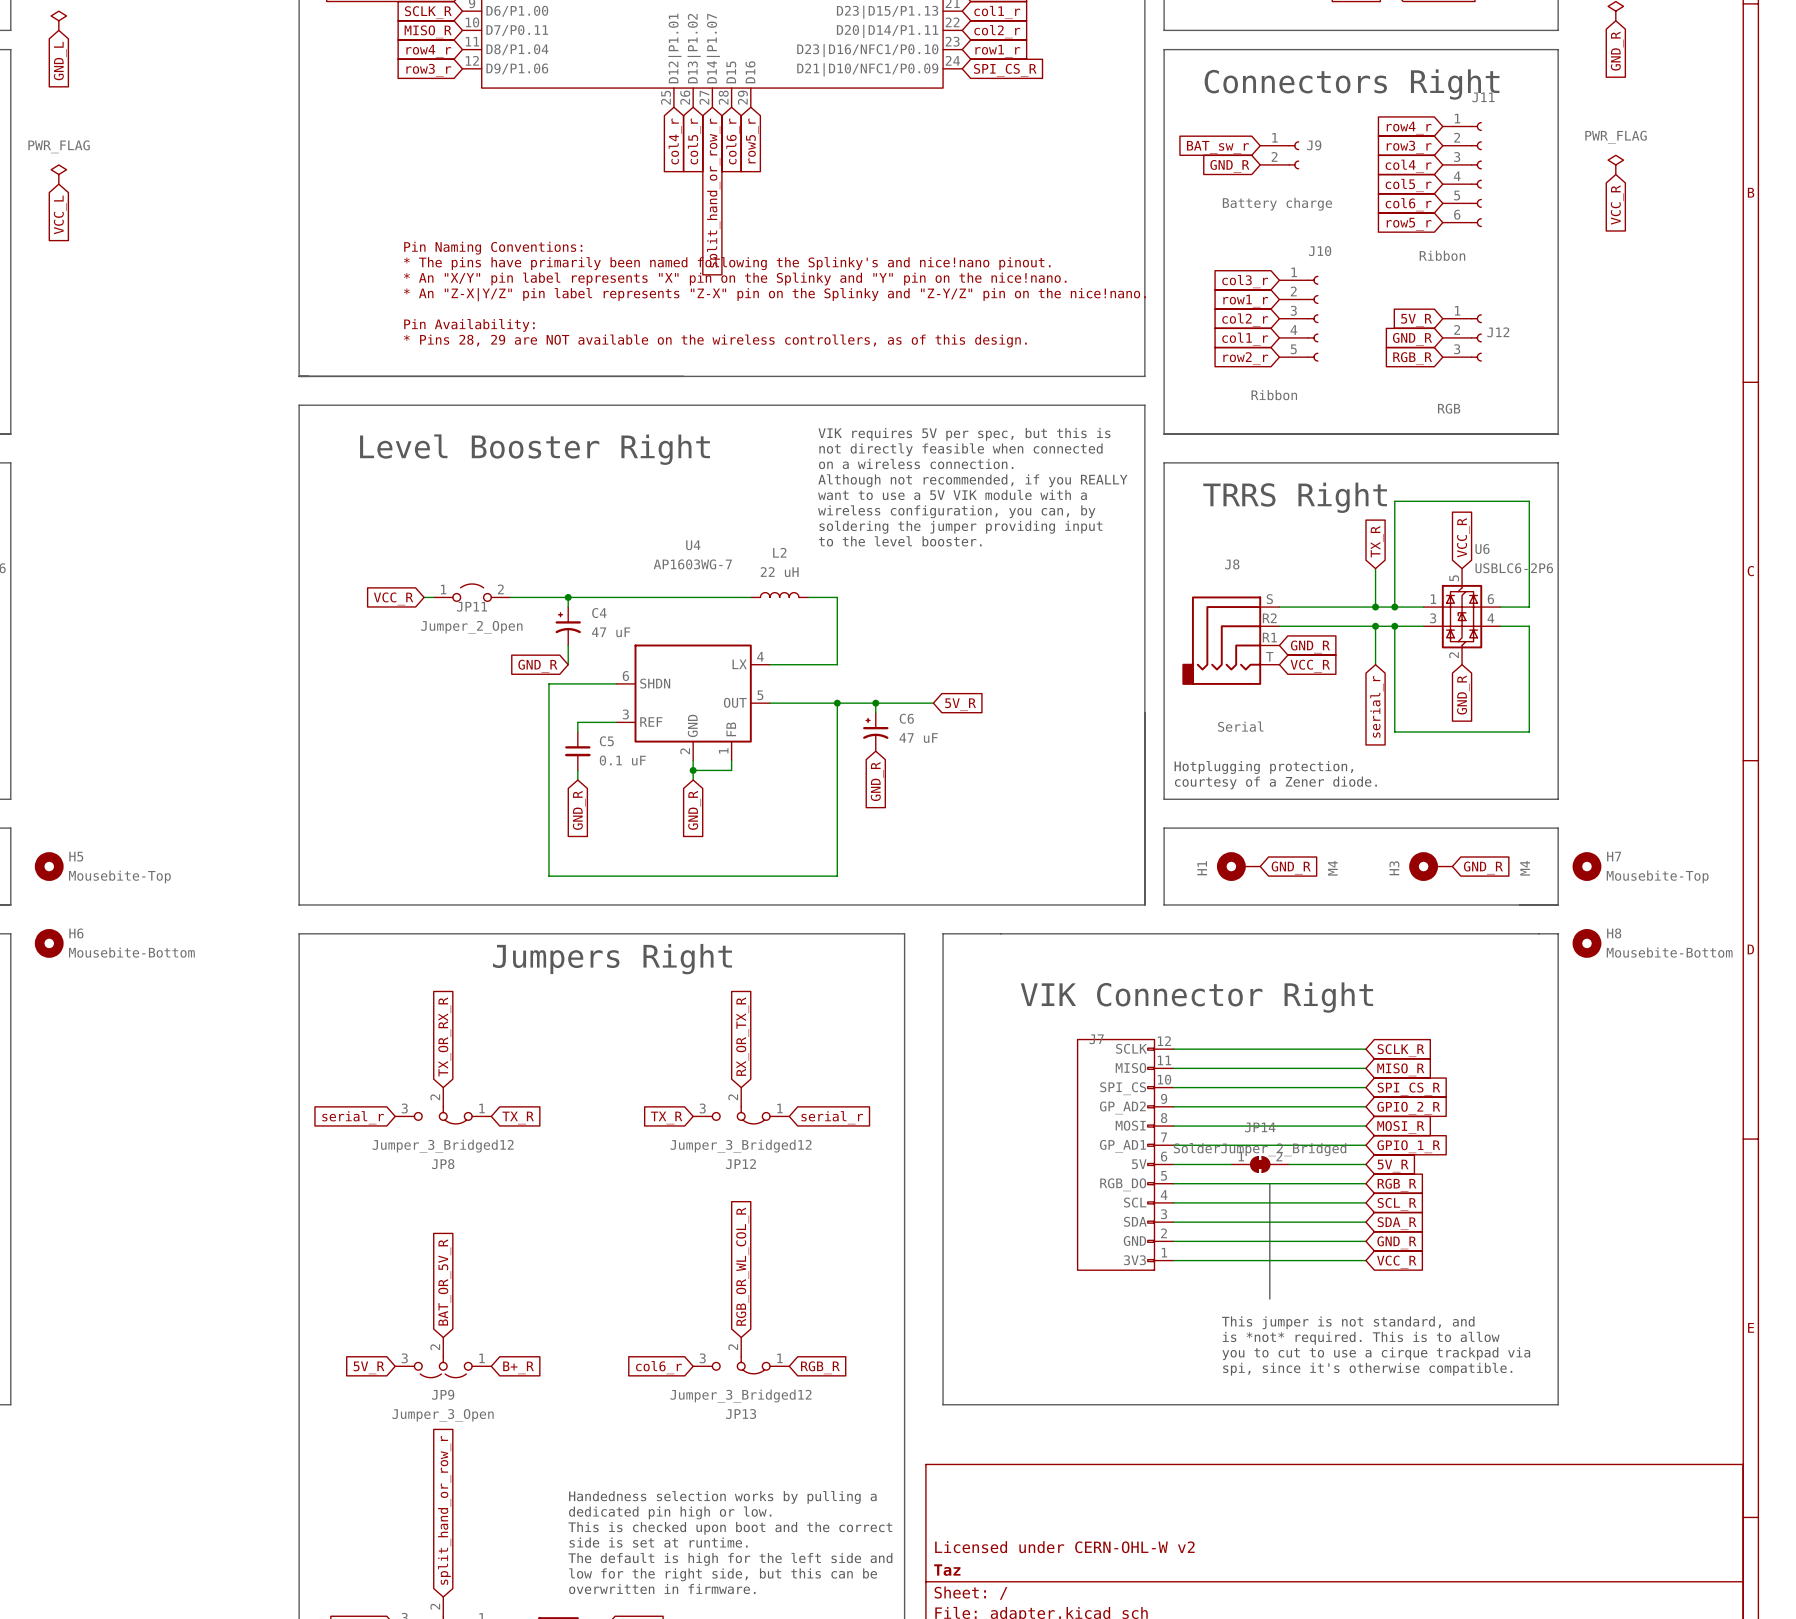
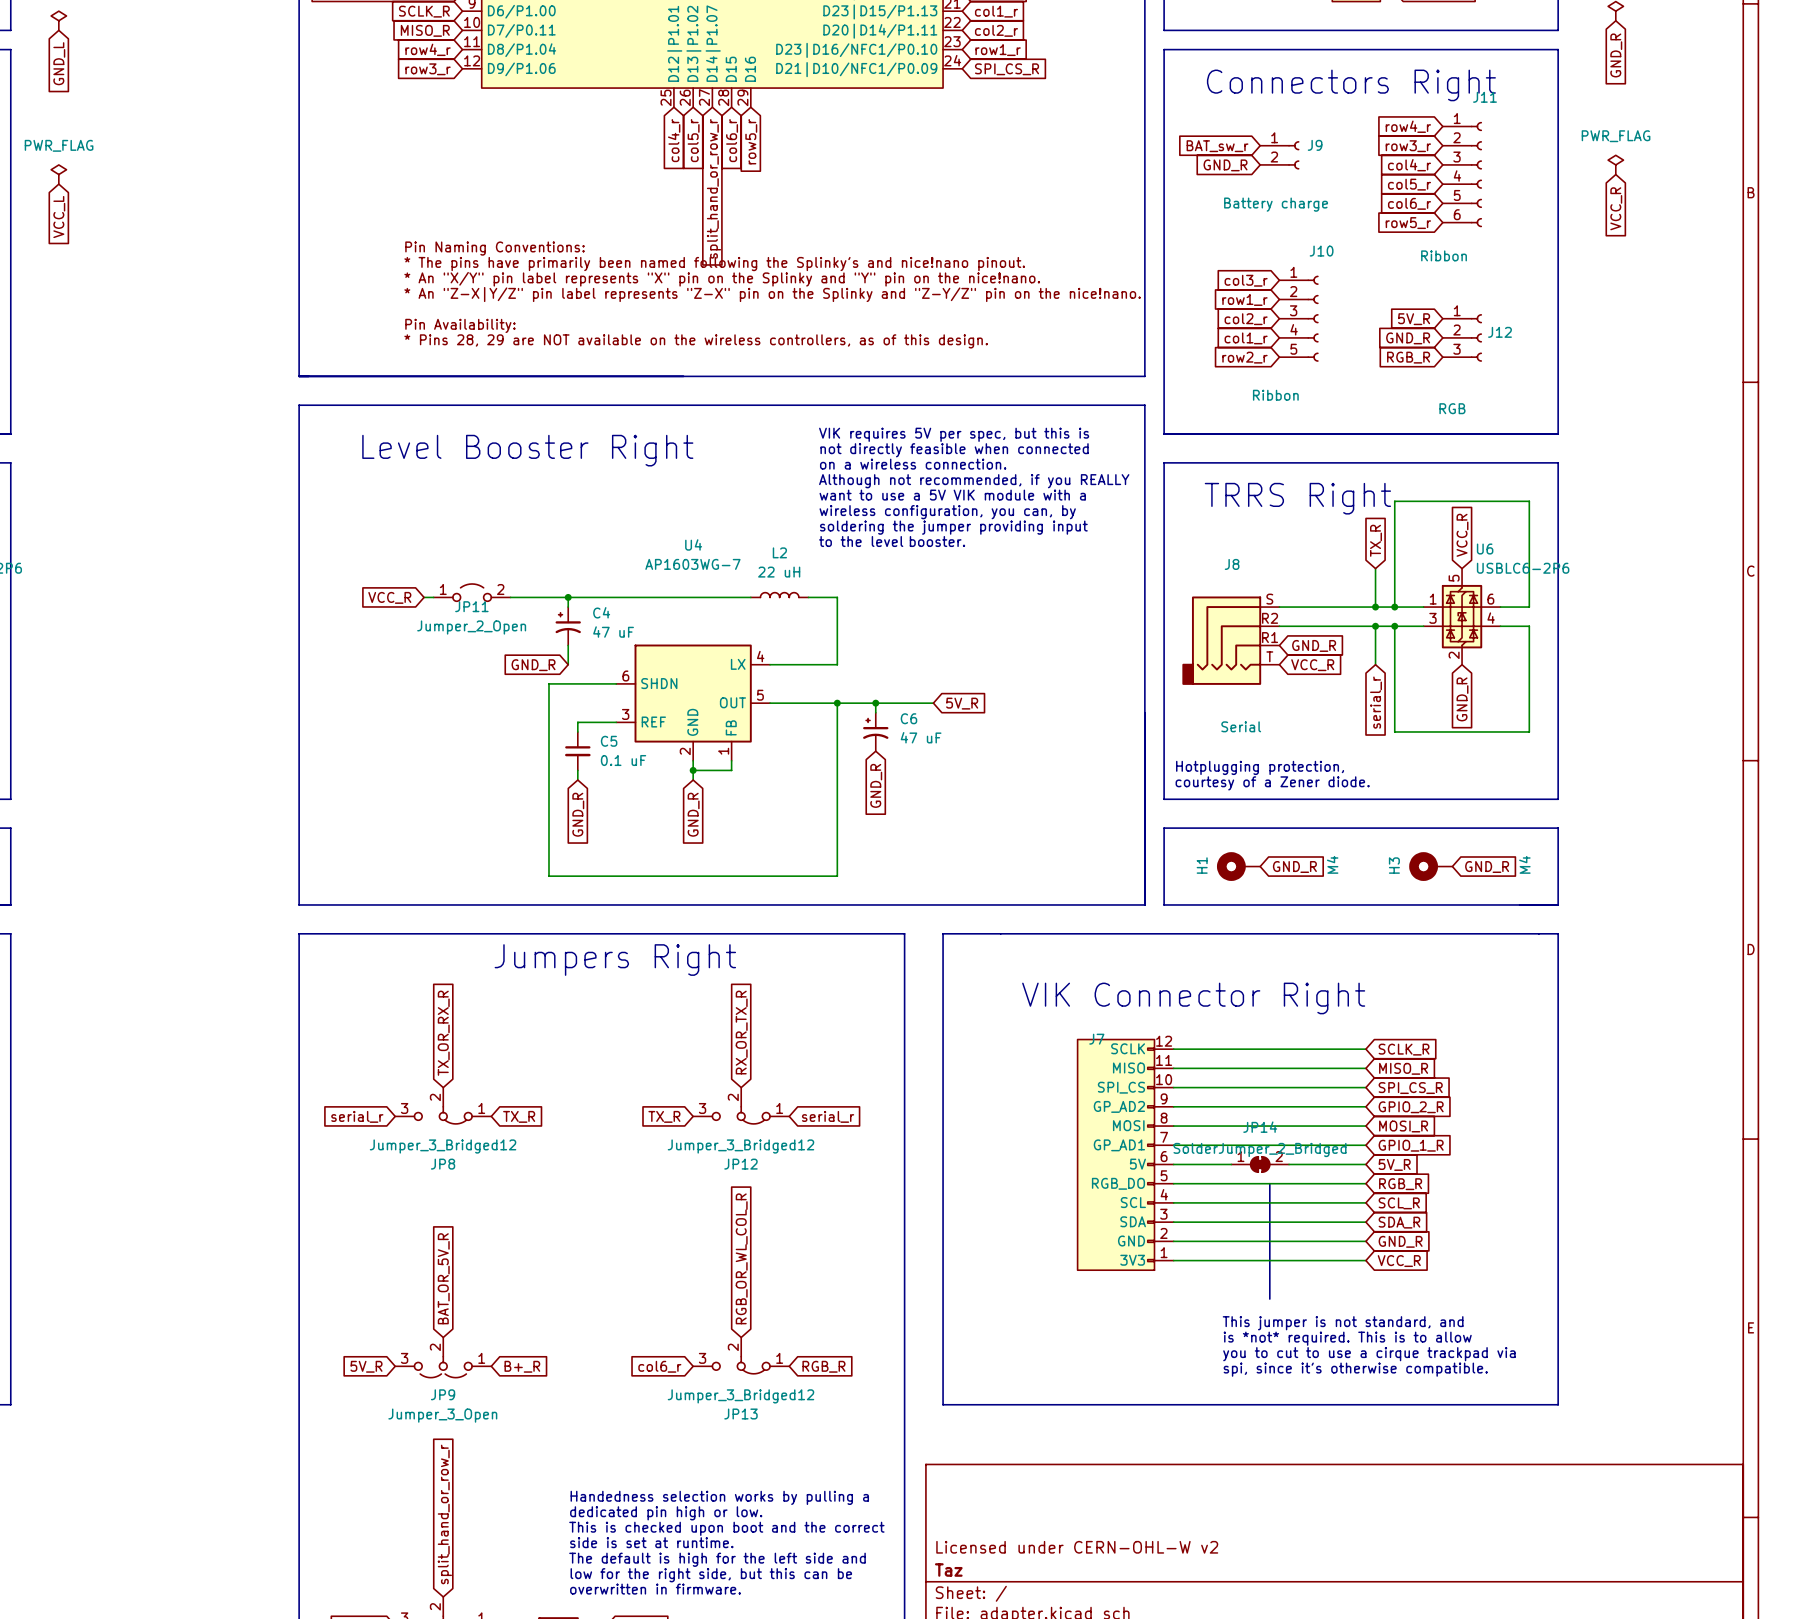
H5: Mousebite-Top (49, 866) -> none
H7: Mousebite-Top (1586, 866) -> none
H6: Mousebite-Bottom (49, 943) -> none
H8: Mousebite-Bottom (1586, 943) -> none

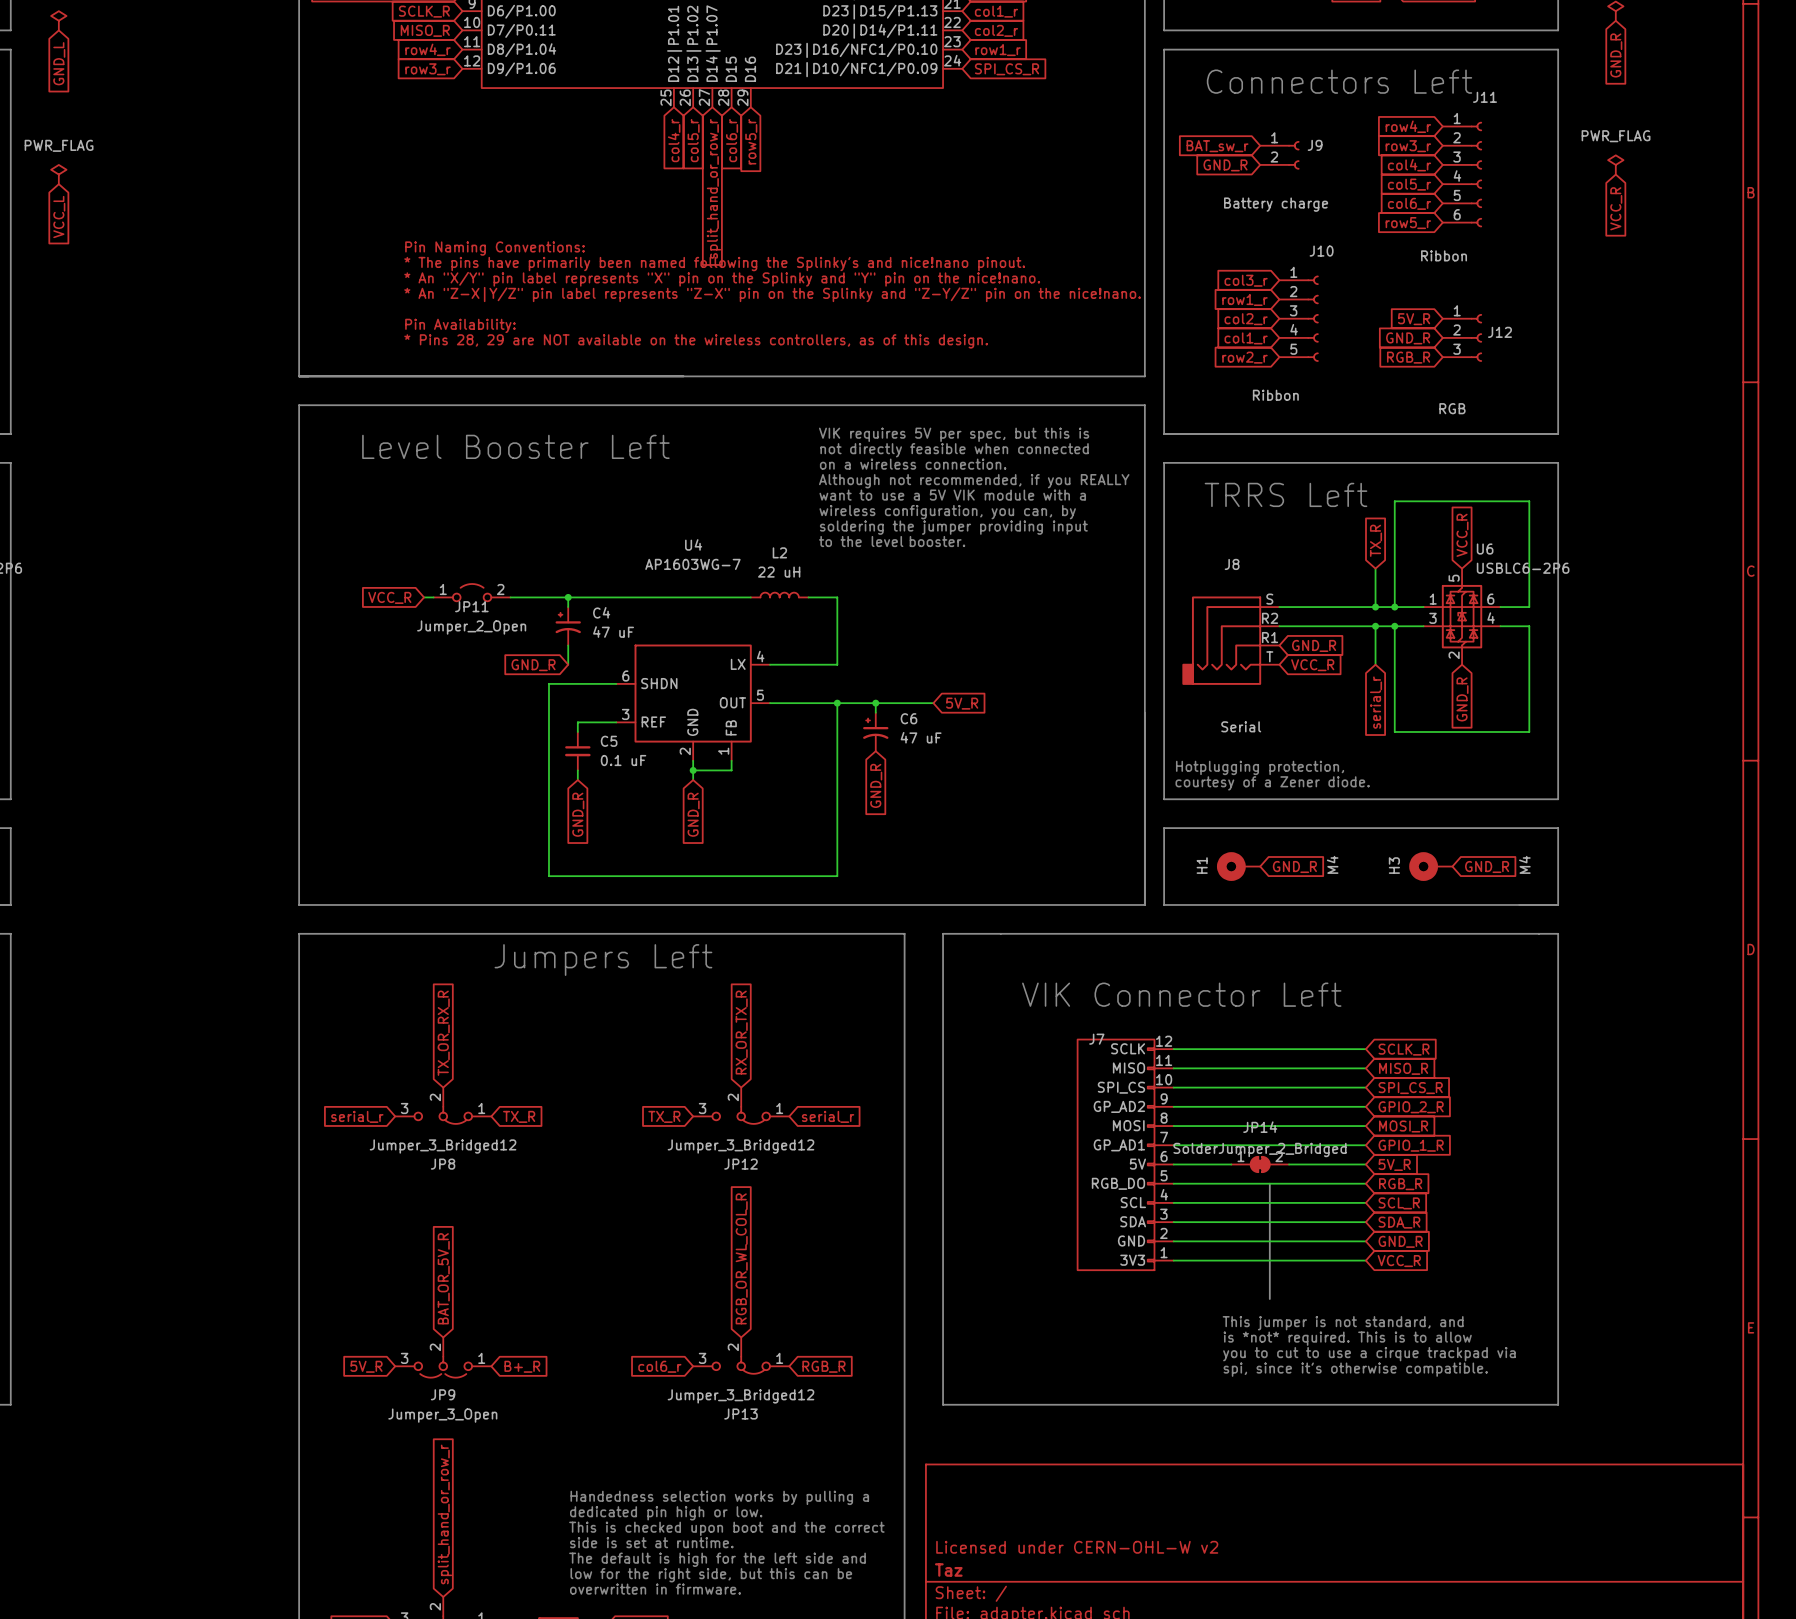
text: Connectors Right (1351, 85) -> Connectors Left (1339, 81)
text: Level Booster Right (527, 450) -> Level Booster Left (515, 446)
text: TRRS Right (1297, 498) -> TRRS Left (1286, 494)
text: Jumpers Right (615, 960) -> Jumpers Left (603, 960)
text: VIK Connector Right (1193, 998) -> VIK Connector Left (1181, 994)

